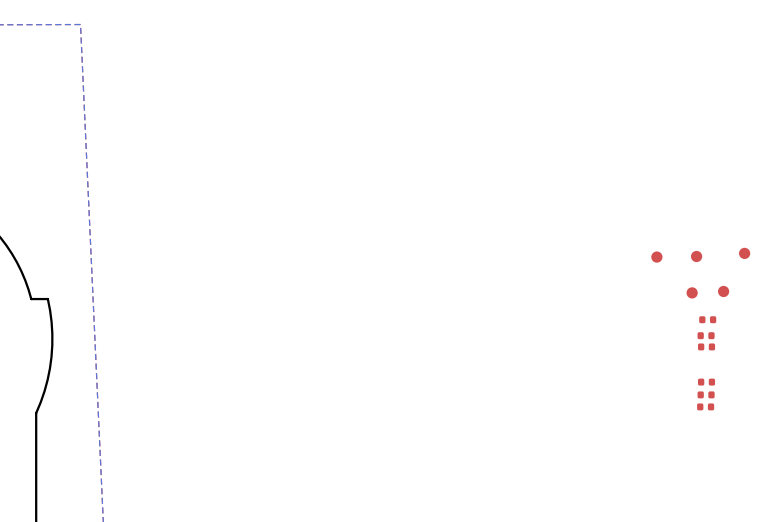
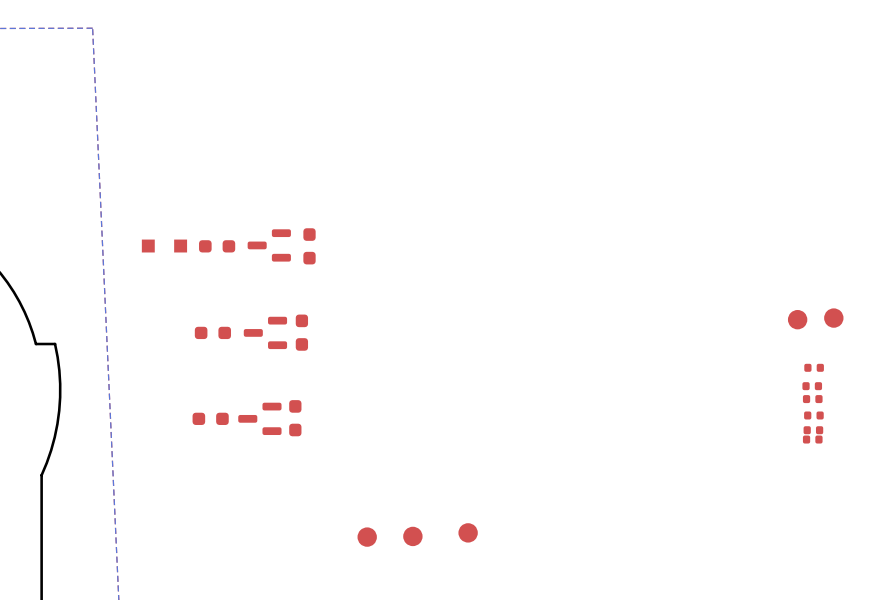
part: none -> (164, 246)
part: none -> (269, 245)
part: none -> (217, 246)
part: none -> (309, 246)
part: (744, 253) -> none
part: (696, 256) -> none
part: (656, 257) -> none
part: none -> (833, 318)
part: none -> (797, 319)
part: none -> (212, 332)
part: none -> (265, 332)
part: none -> (301, 332)
part: (723, 291) -> none
part: (692, 292) -> none
part: none -> (813, 415)
part: none -> (295, 418)
part: none -> (210, 418)
part: none -> (259, 418)
part: none -> (813, 430)
part: (706, 394) -> none
part: (705, 406) -> none
part: none -> (468, 532)
part: none -> (367, 537)
part: none -> (412, 536)

